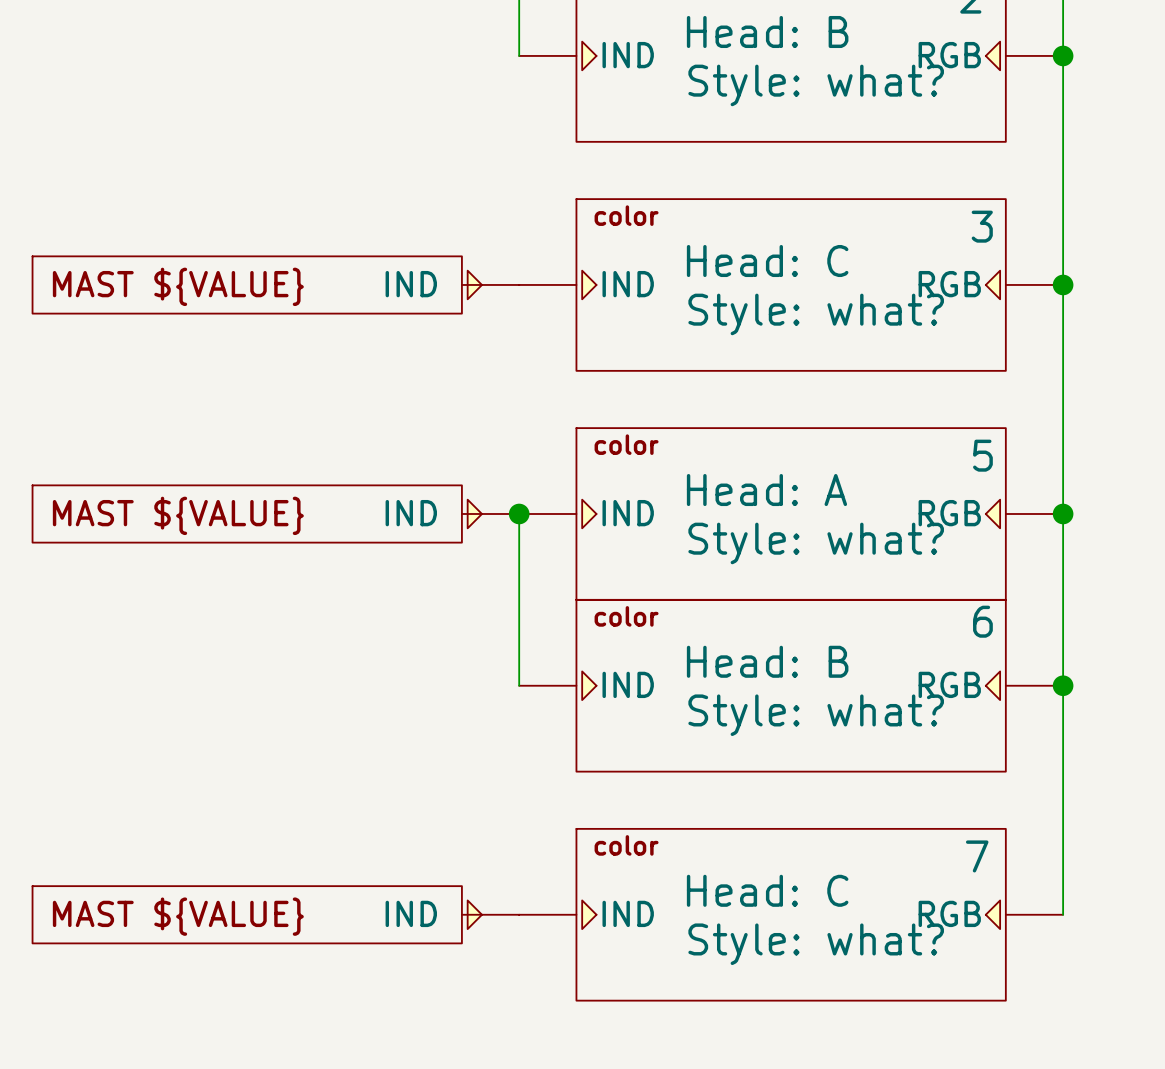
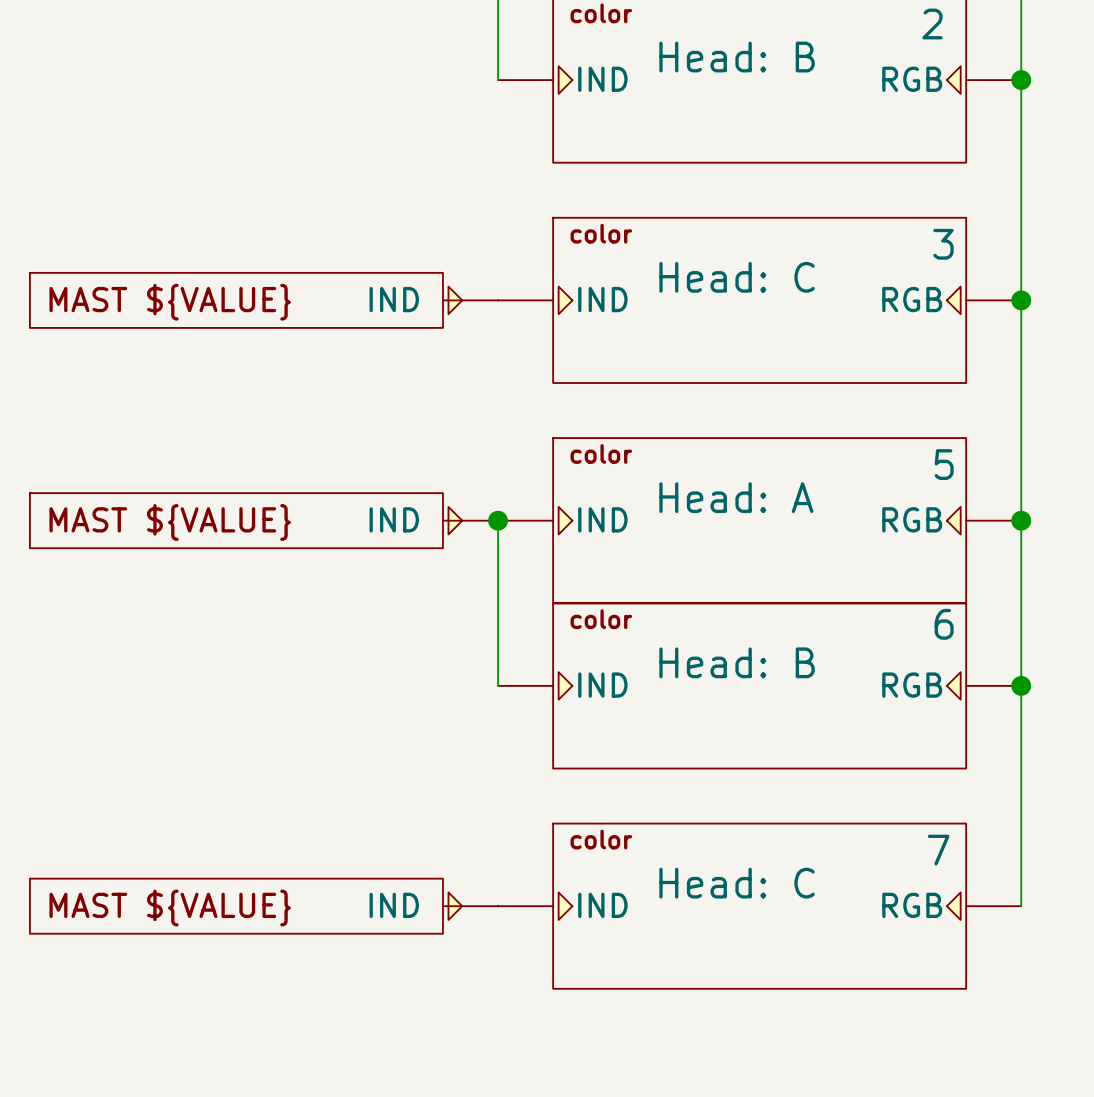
part text: Style: what? (816, 85) -> none
part text: Style: what? (816, 314) -> none
part text: Style: what? (816, 543) -> none
part text: Style: what? (816, 715) -> none
part text: Style: what? (816, 944) -> none

